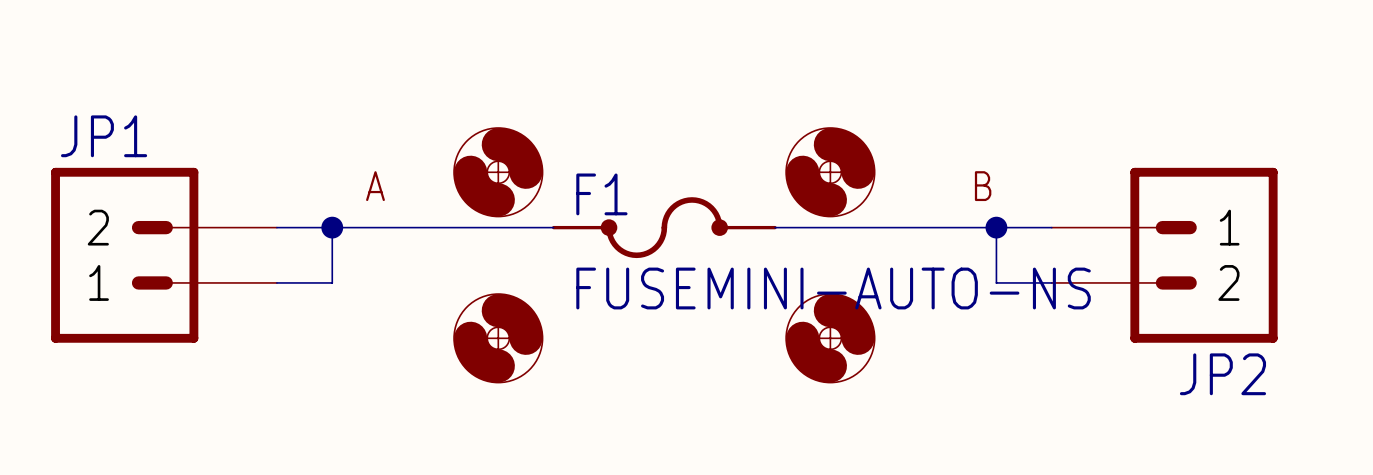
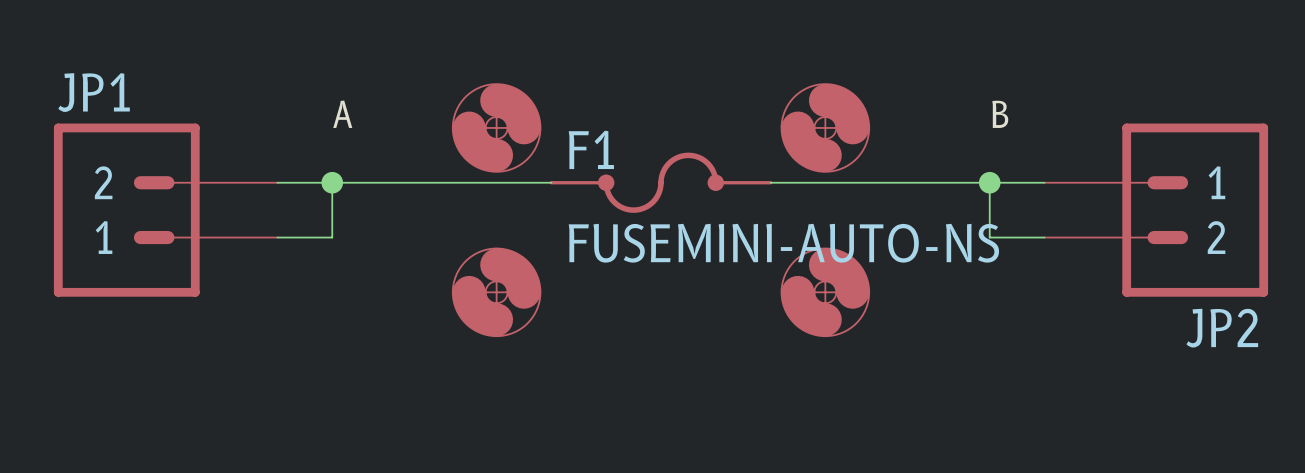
label position: A (375, 186) -> A (342, 114)
label position: B (983, 186) -> B (1000, 114)

